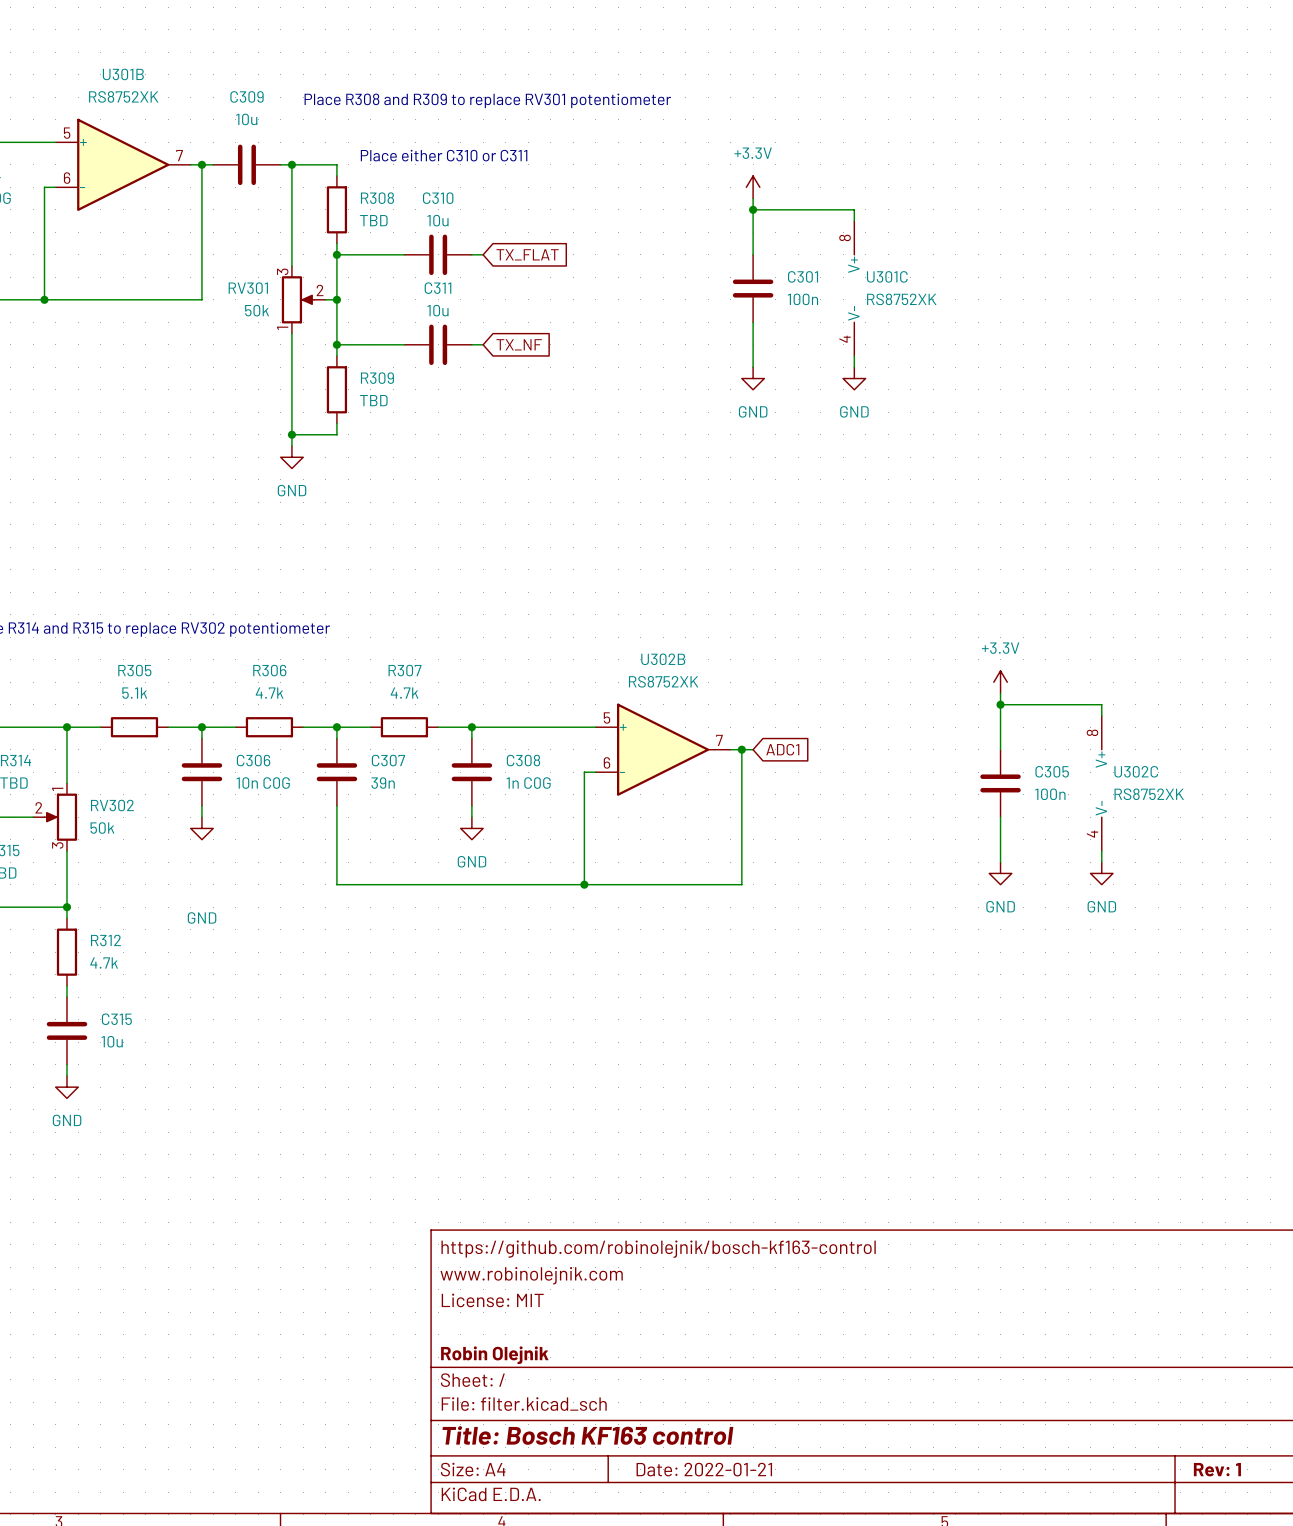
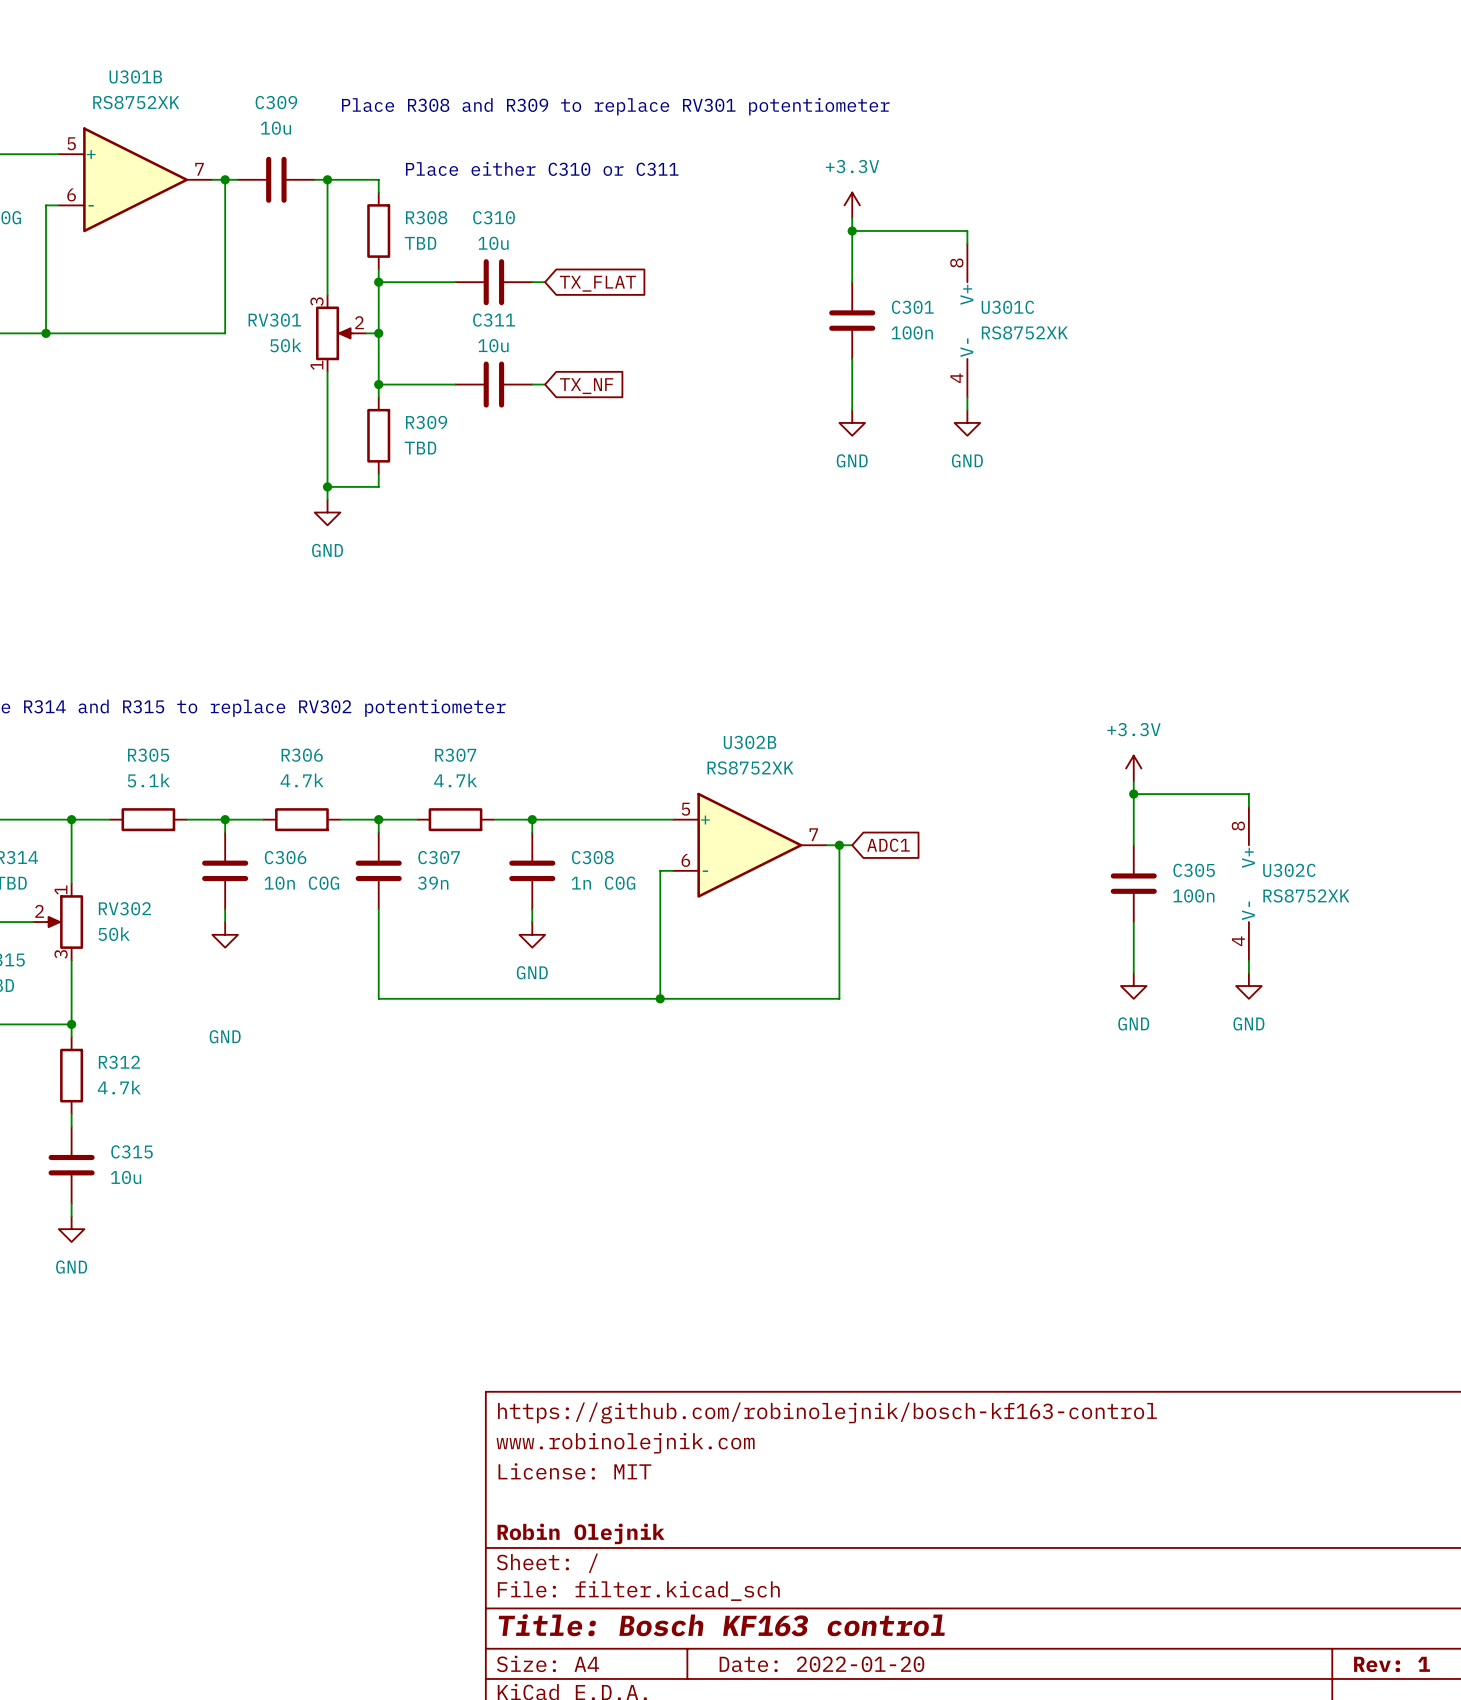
title block: Date: 2022-01-21 (704, 1469) -> Date: 2022-01-20 (821, 1664)

